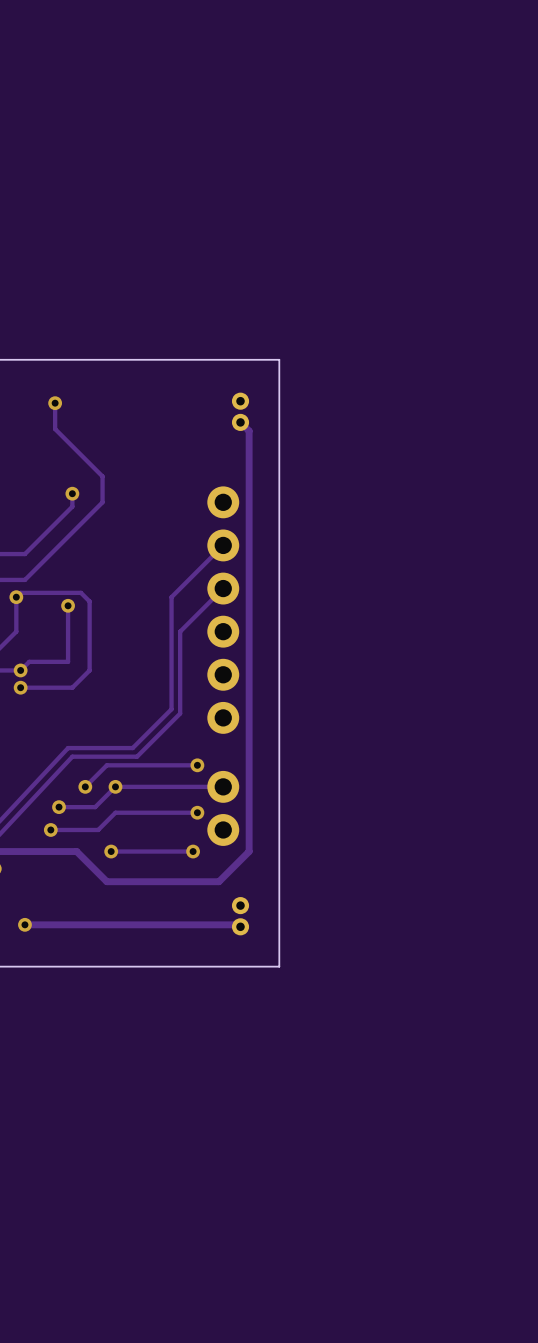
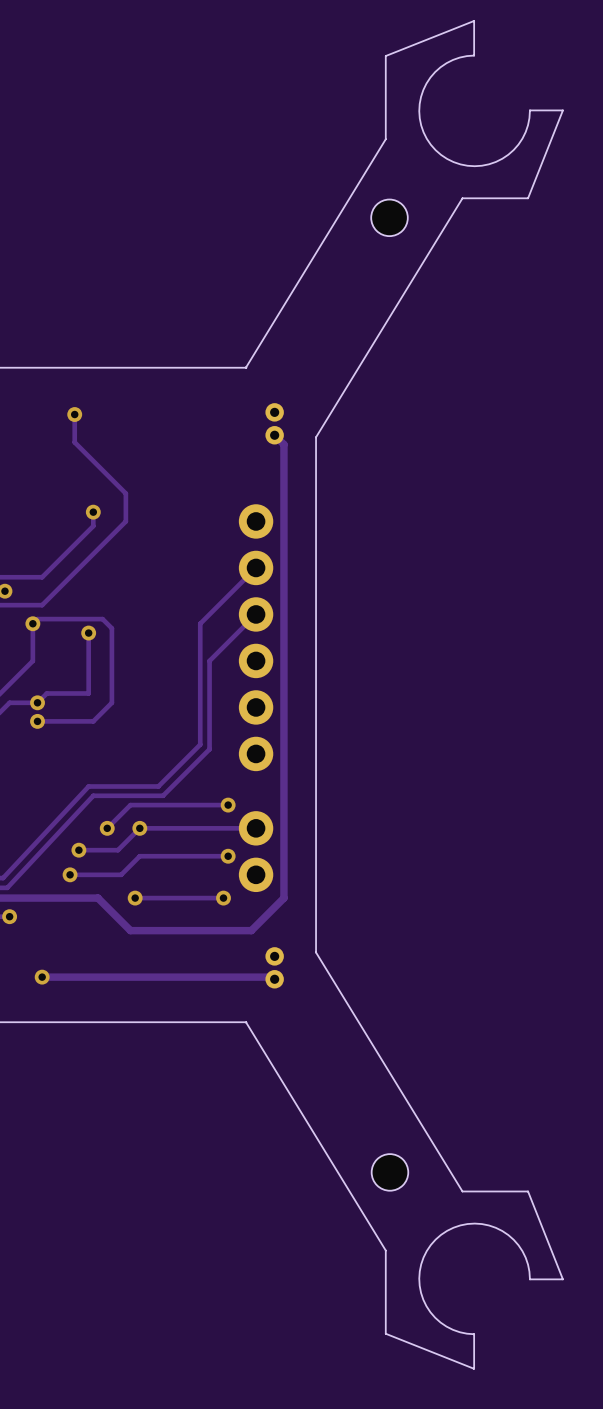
hole: none -> (389, 217)
board edge: (214, 359) (279, 359) (279, 966) (214, 966) -> (246, 368) (385, 139) (385, 56) (474, 21) (474, 55) (459, 57) (440, 67) (430, 77) (421, 96) (419, 111) (421, 125) (426, 138) (435, 150) (447, 158) (460, 164) (474, 166) (489, 164) (508, 154) (518, 144) (528, 125) (529, 110) (562, 110) (528, 198) (462, 198) (316, 437) (316, 952) (462, 1191) (528, 1191) (562, 1279) (529, 1279) (528, 1264) (518, 1245) (508, 1235) (489, 1225) (474, 1223) (460, 1225) (447, 1230) (435, 1239) (426, 1251) (421, 1264) (419, 1278) (421, 1292) (430, 1312) (440, 1322) (459, 1332) (474, 1334) (474, 1368) (385, 1333) (385, 1250) (246, 1022)
hole: none -> (389, 1172)

